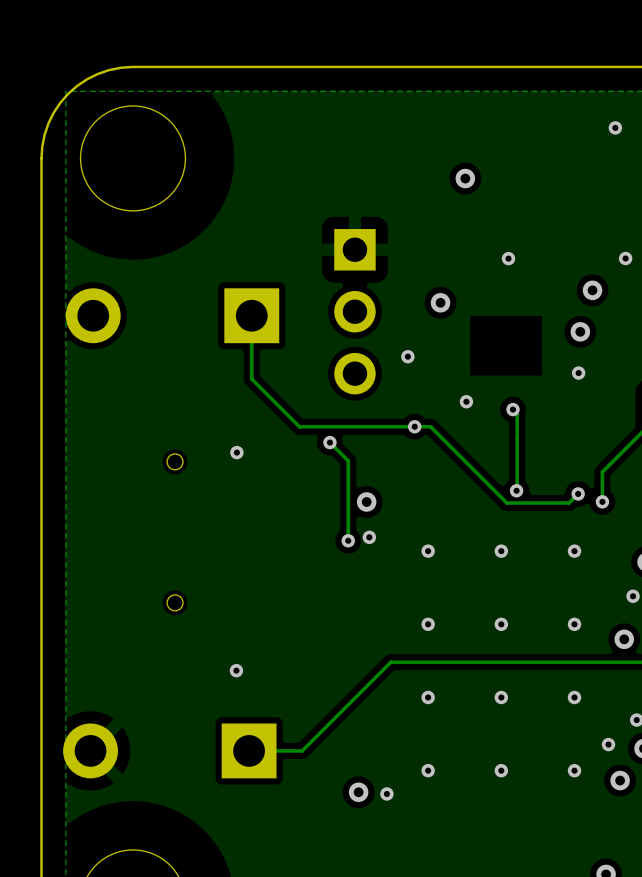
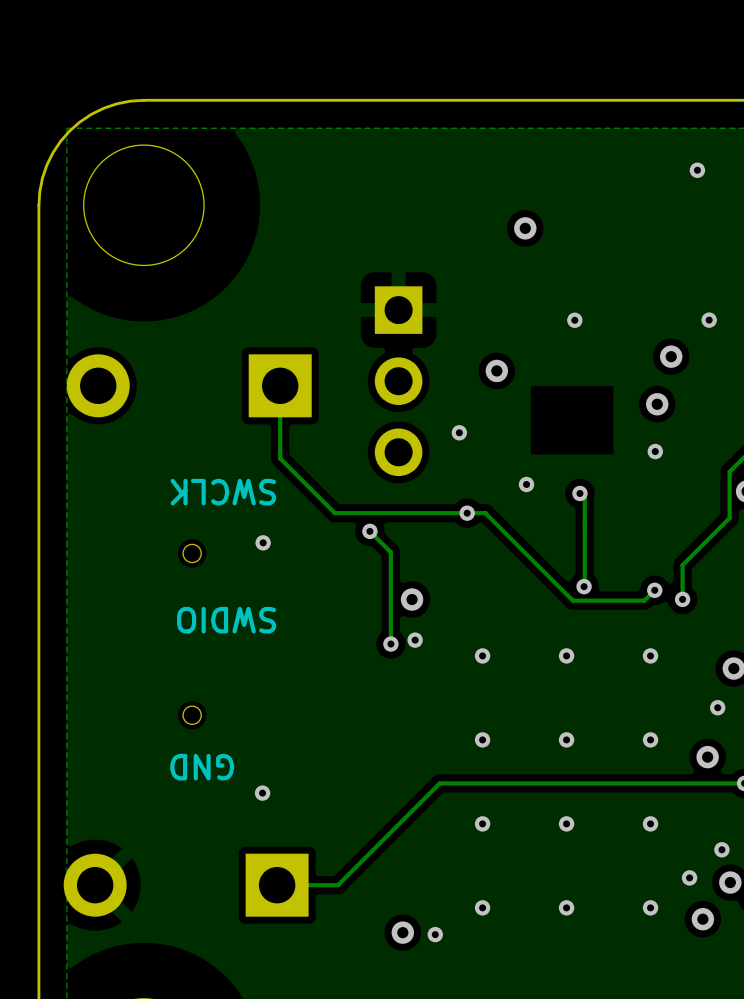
text: none -> SWCLK (223, 492)
text: none -> SWDIO (226, 620)
text: none -> GND (202, 767)

